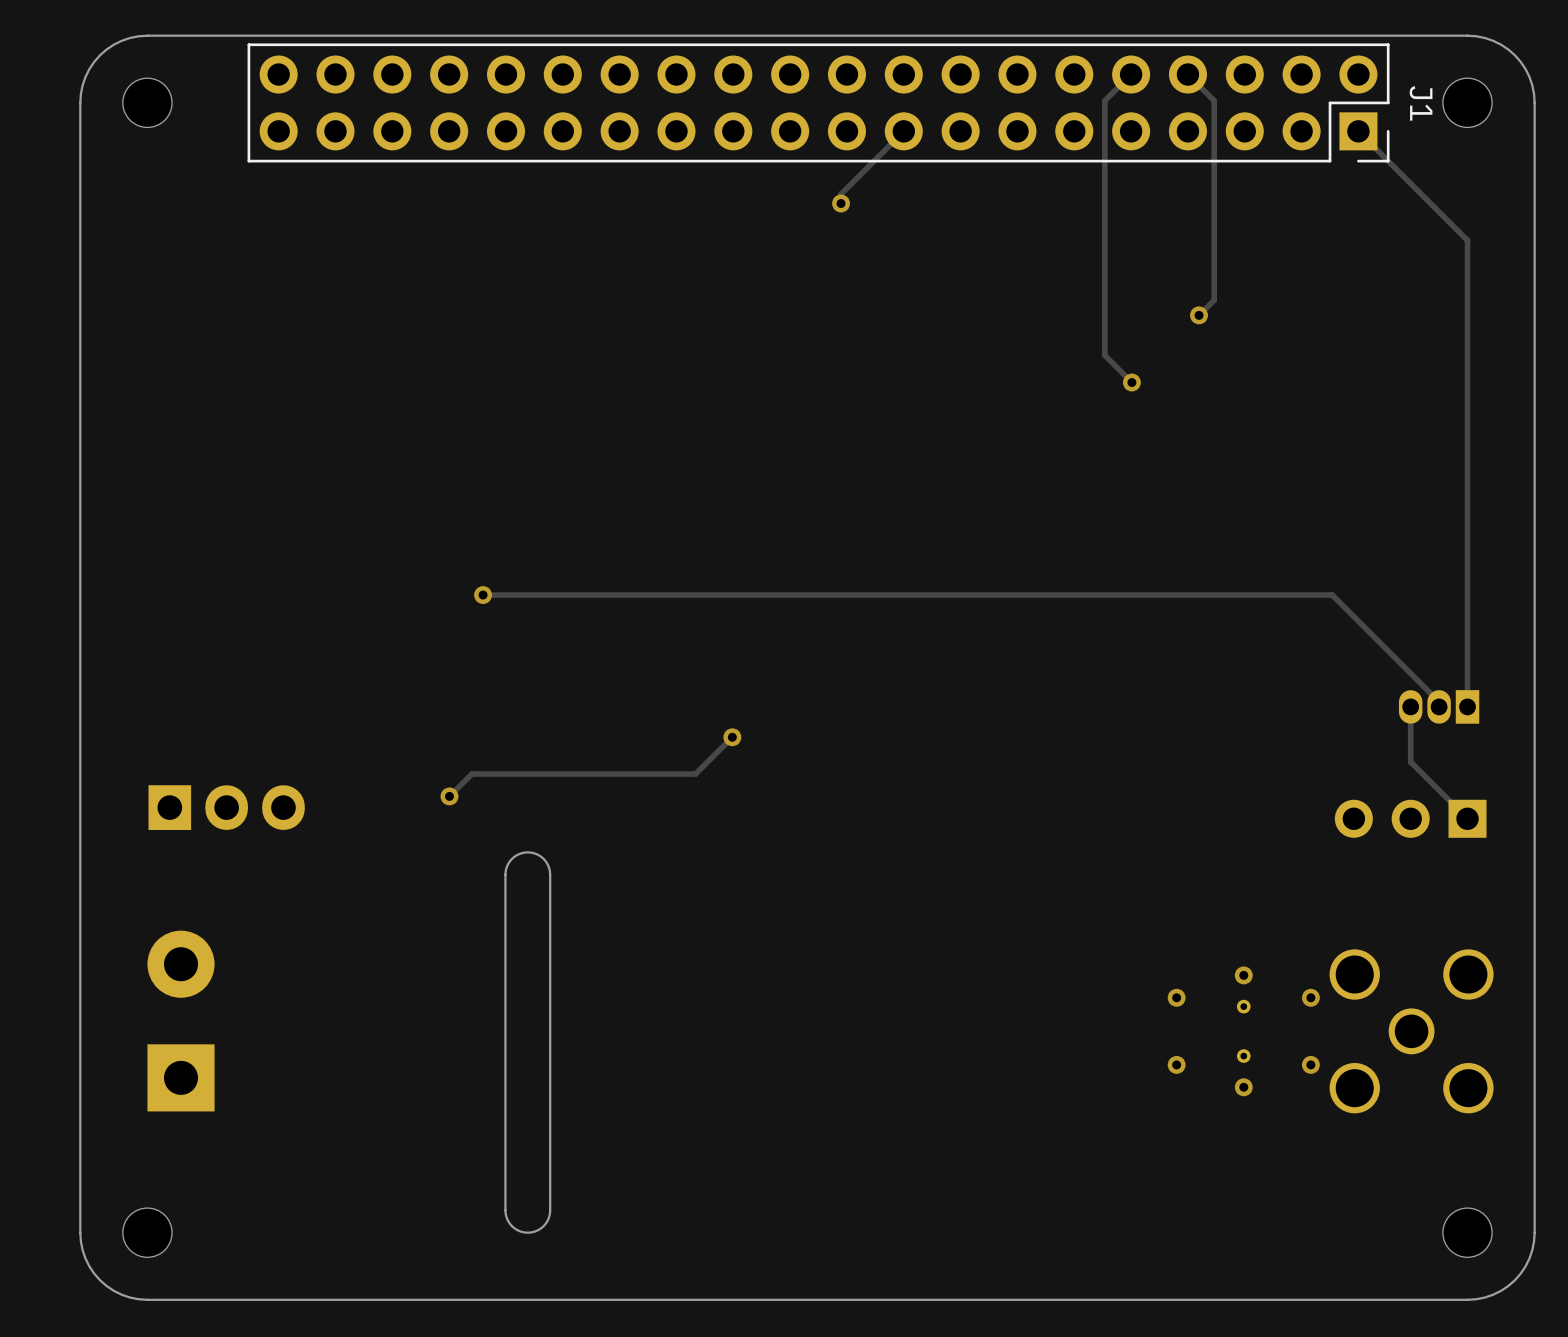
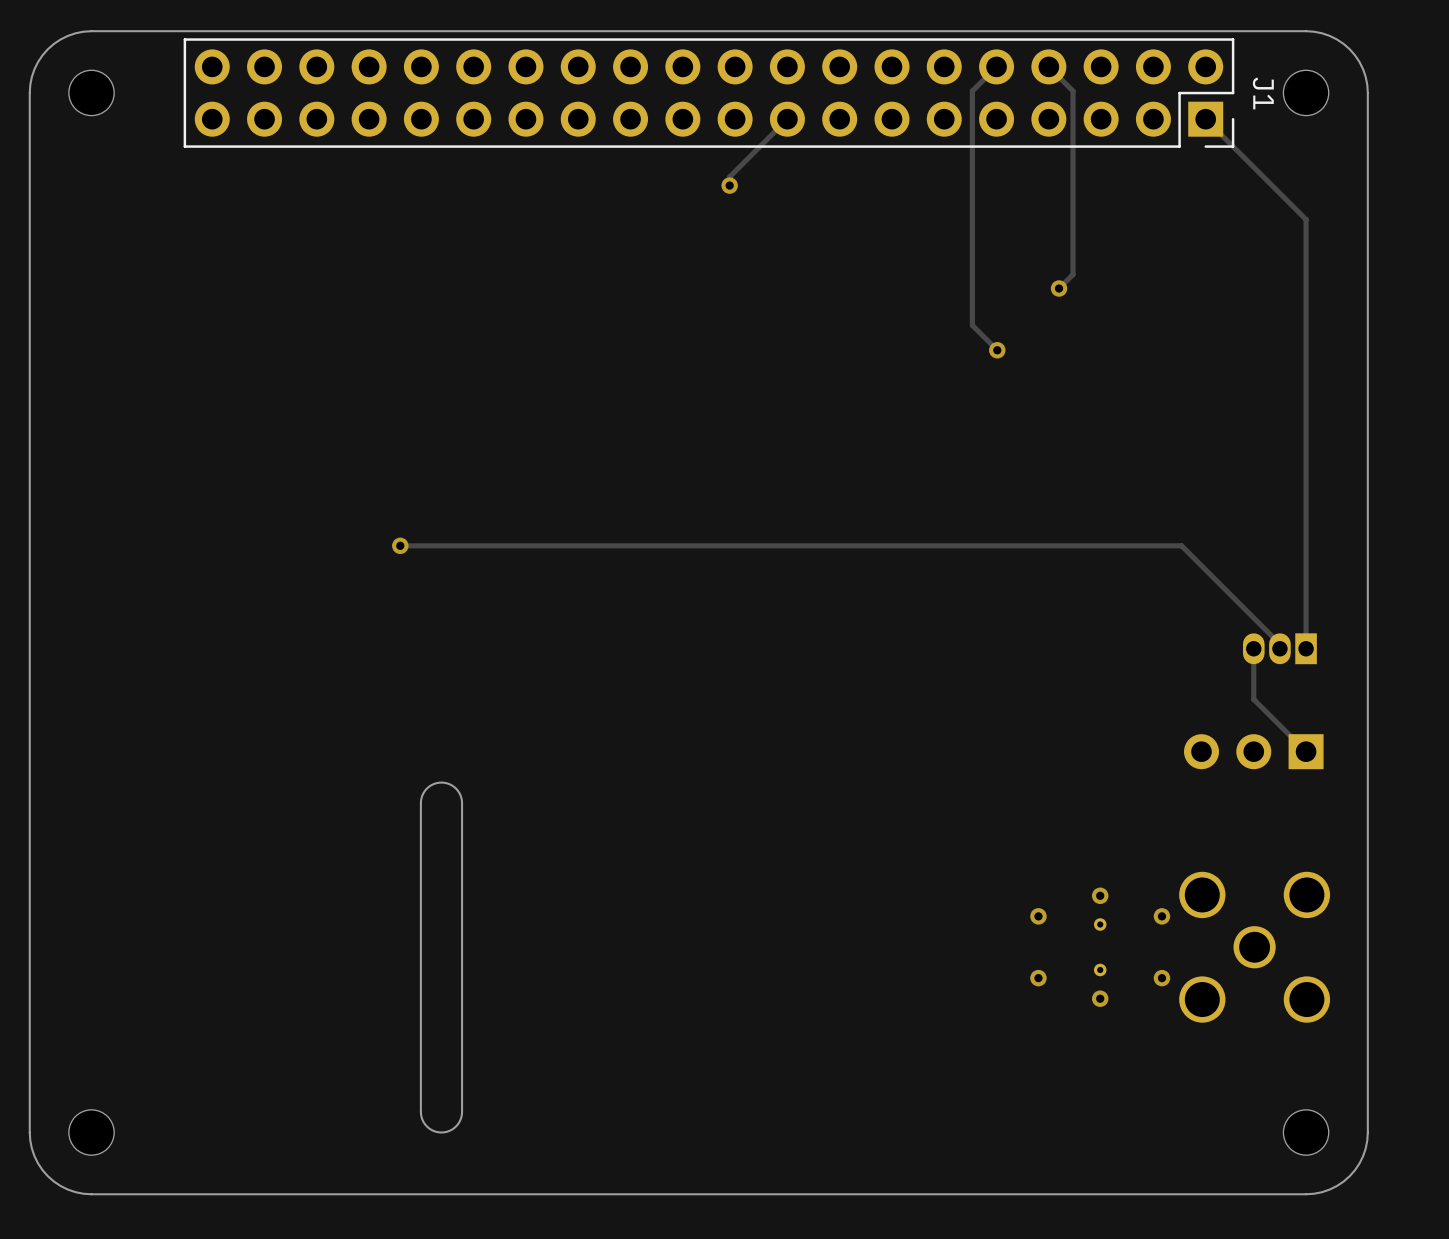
track: (732, 737) (695, 774) (471, 774) (449, 796) -> none
via: (732, 737) -> none
via: (449, 796) -> none
part: (226, 807) -> none
part: (181, 1021) -> none

